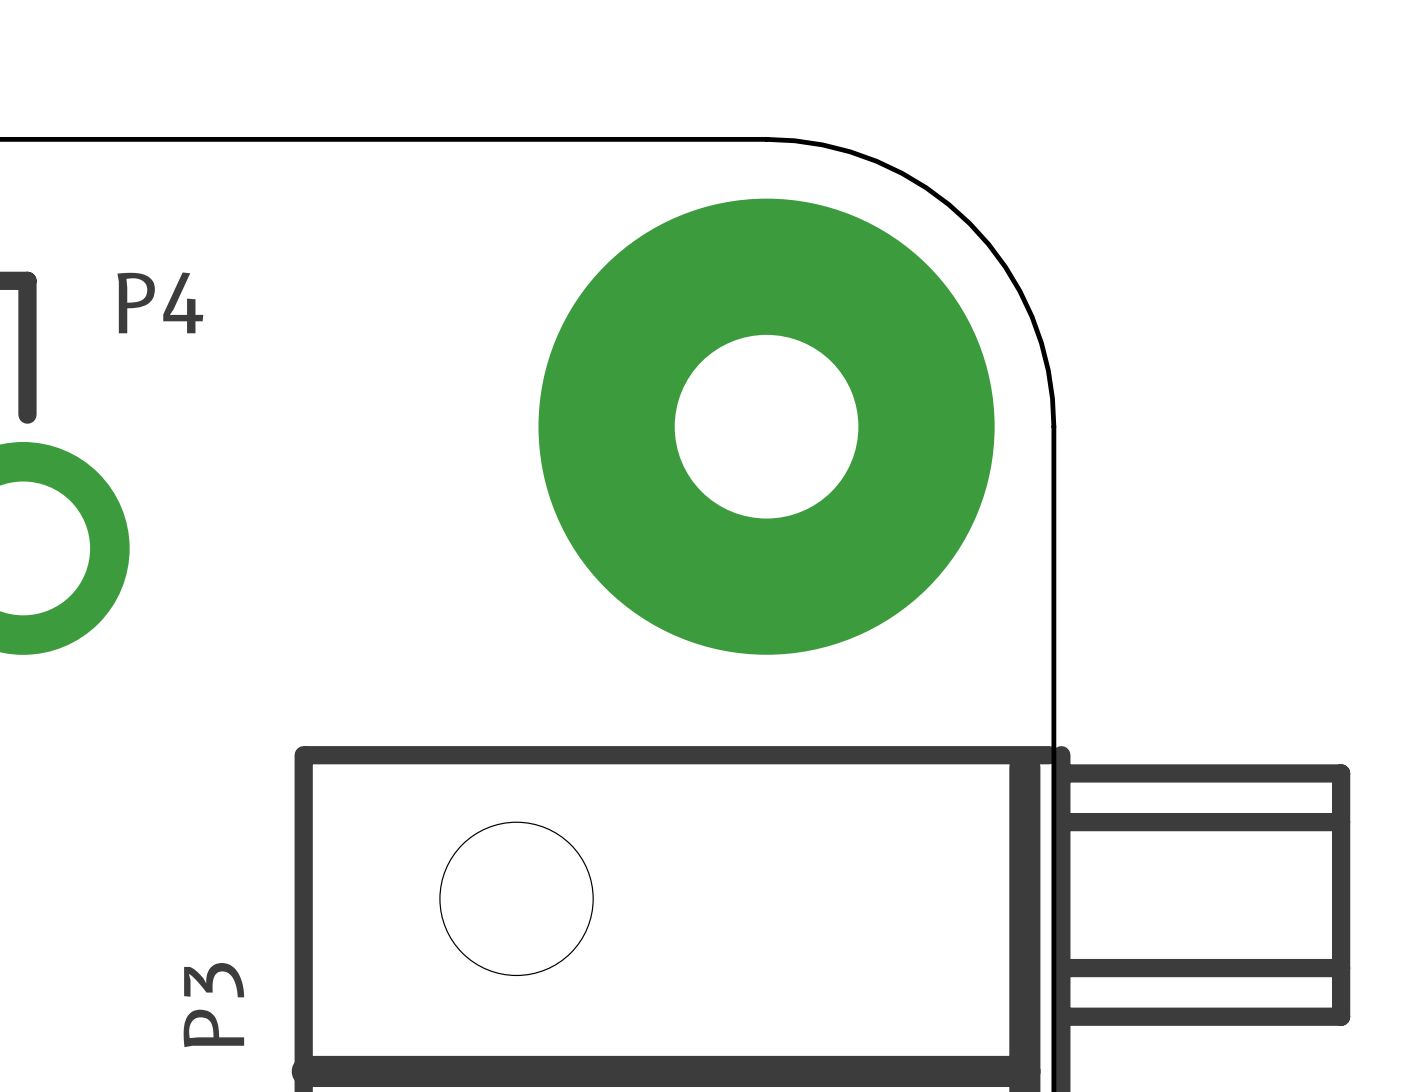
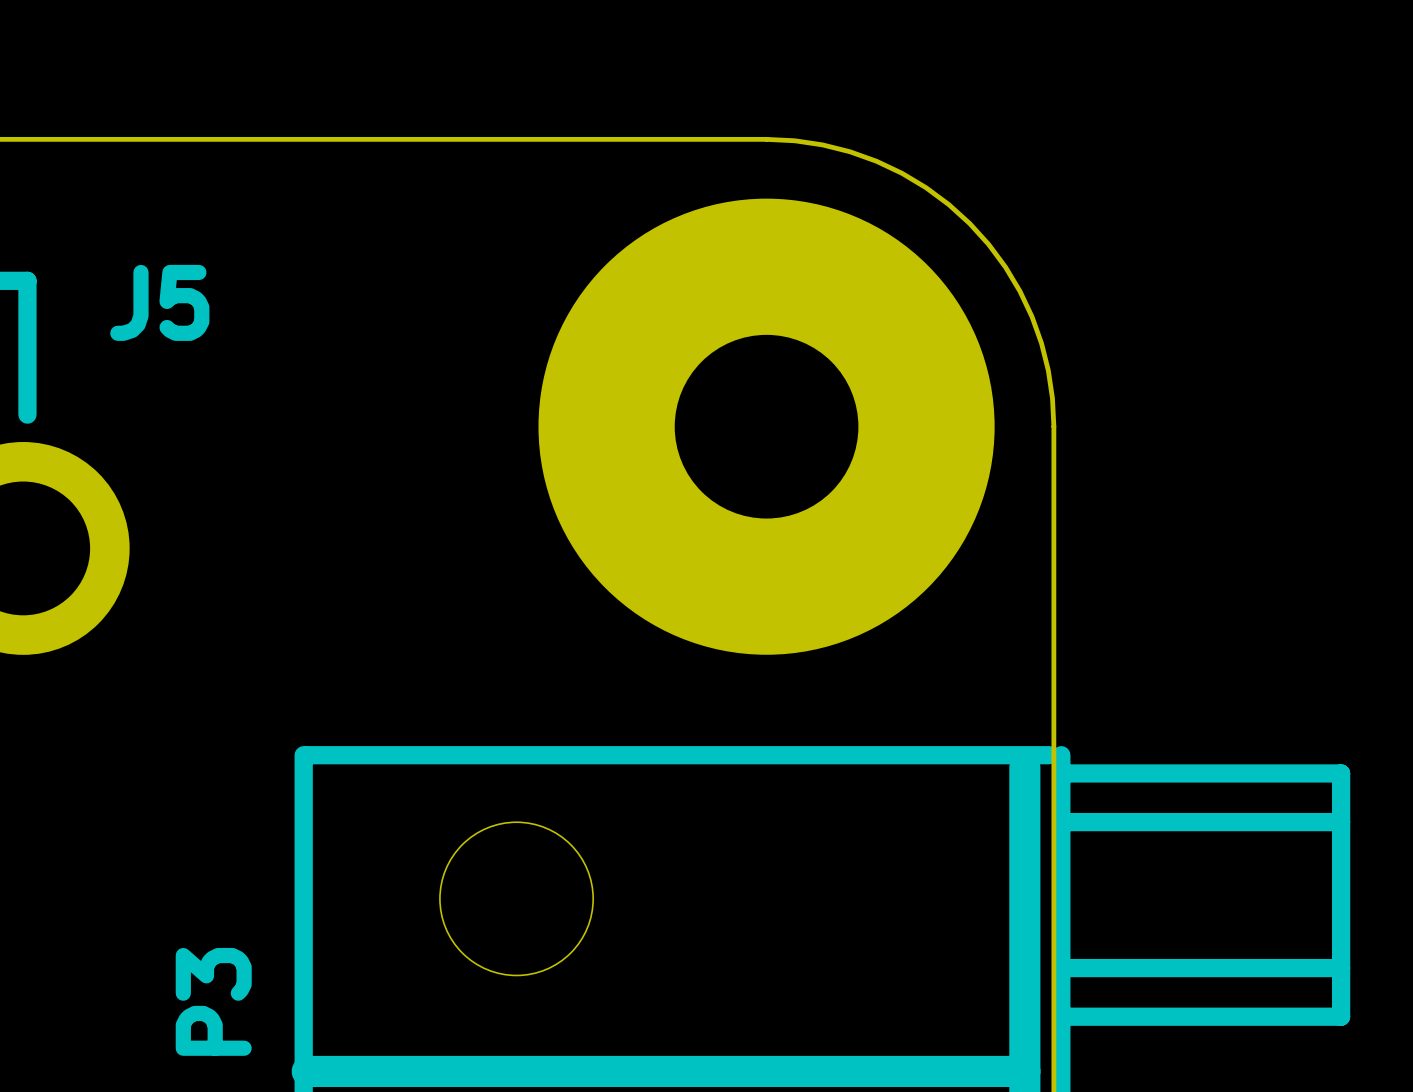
P4 name: P4 (160, 302) -> J5 (159, 302)

